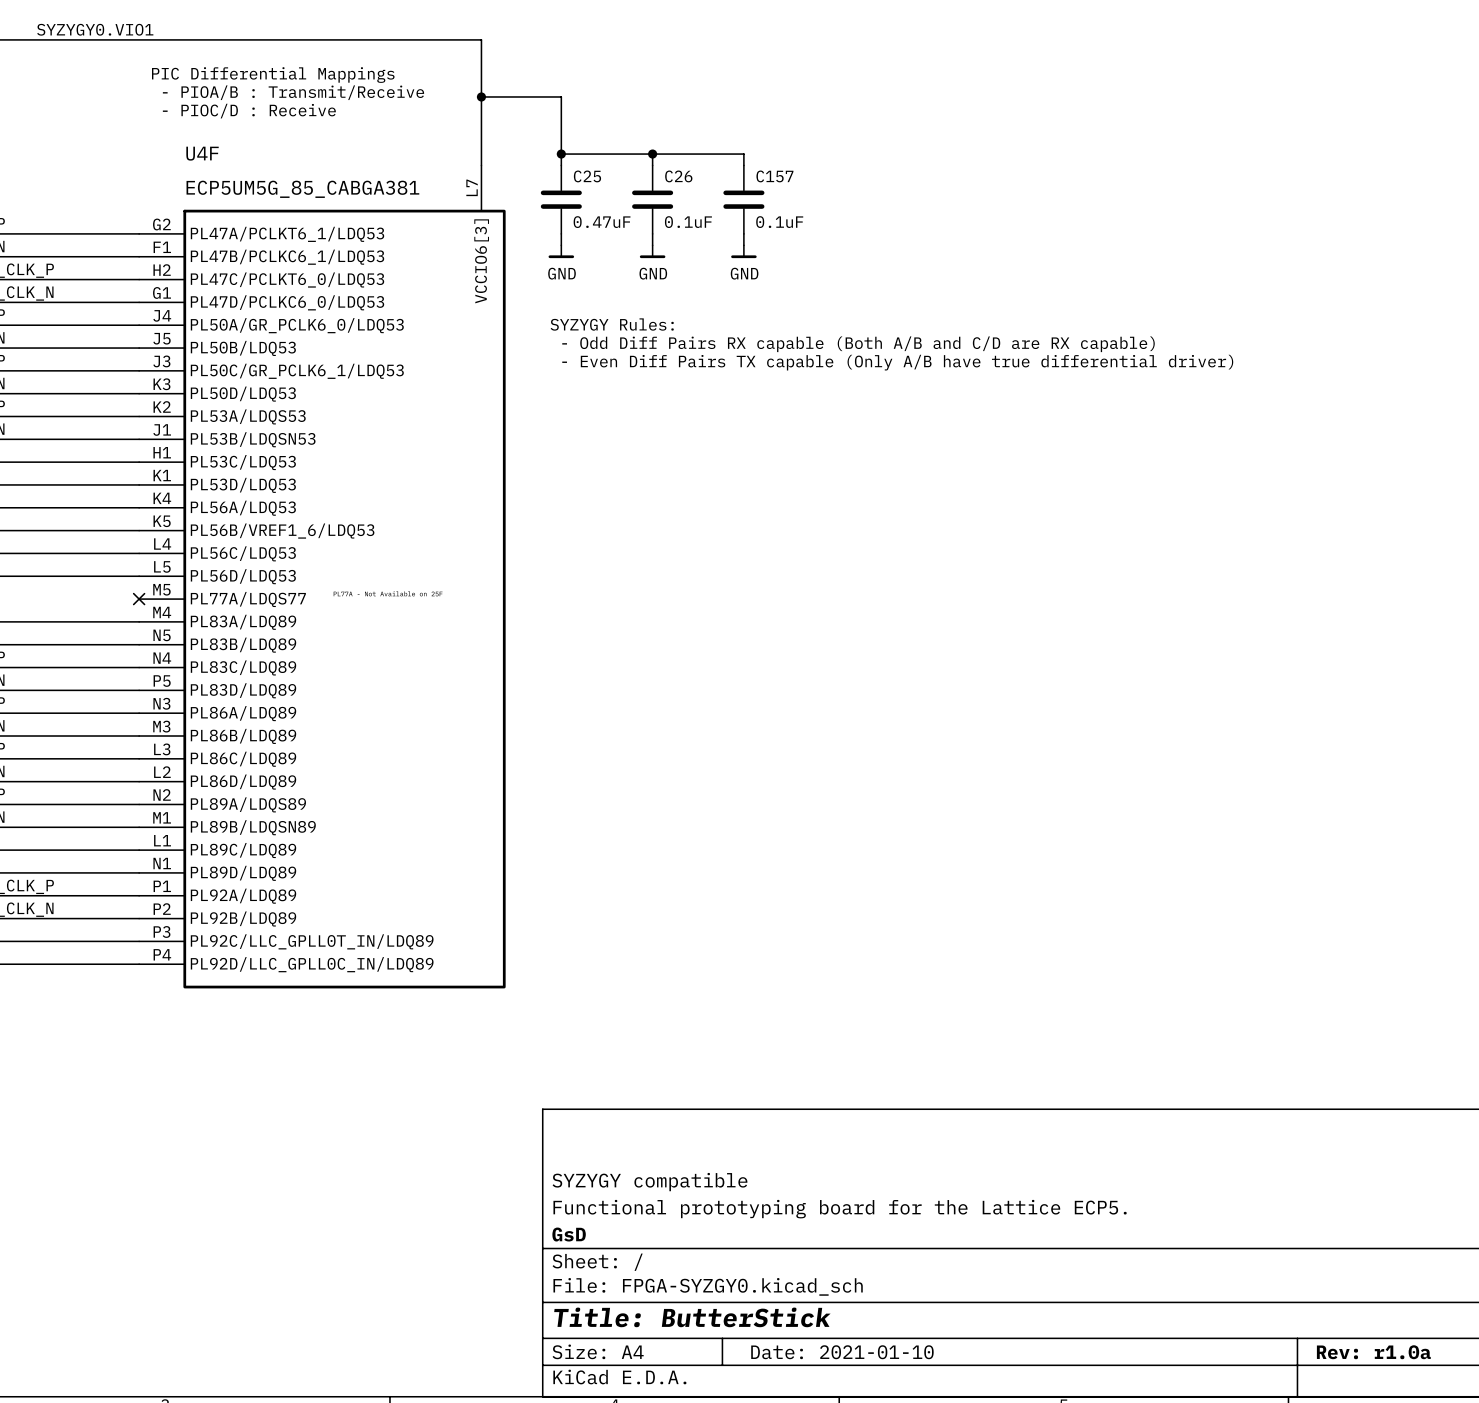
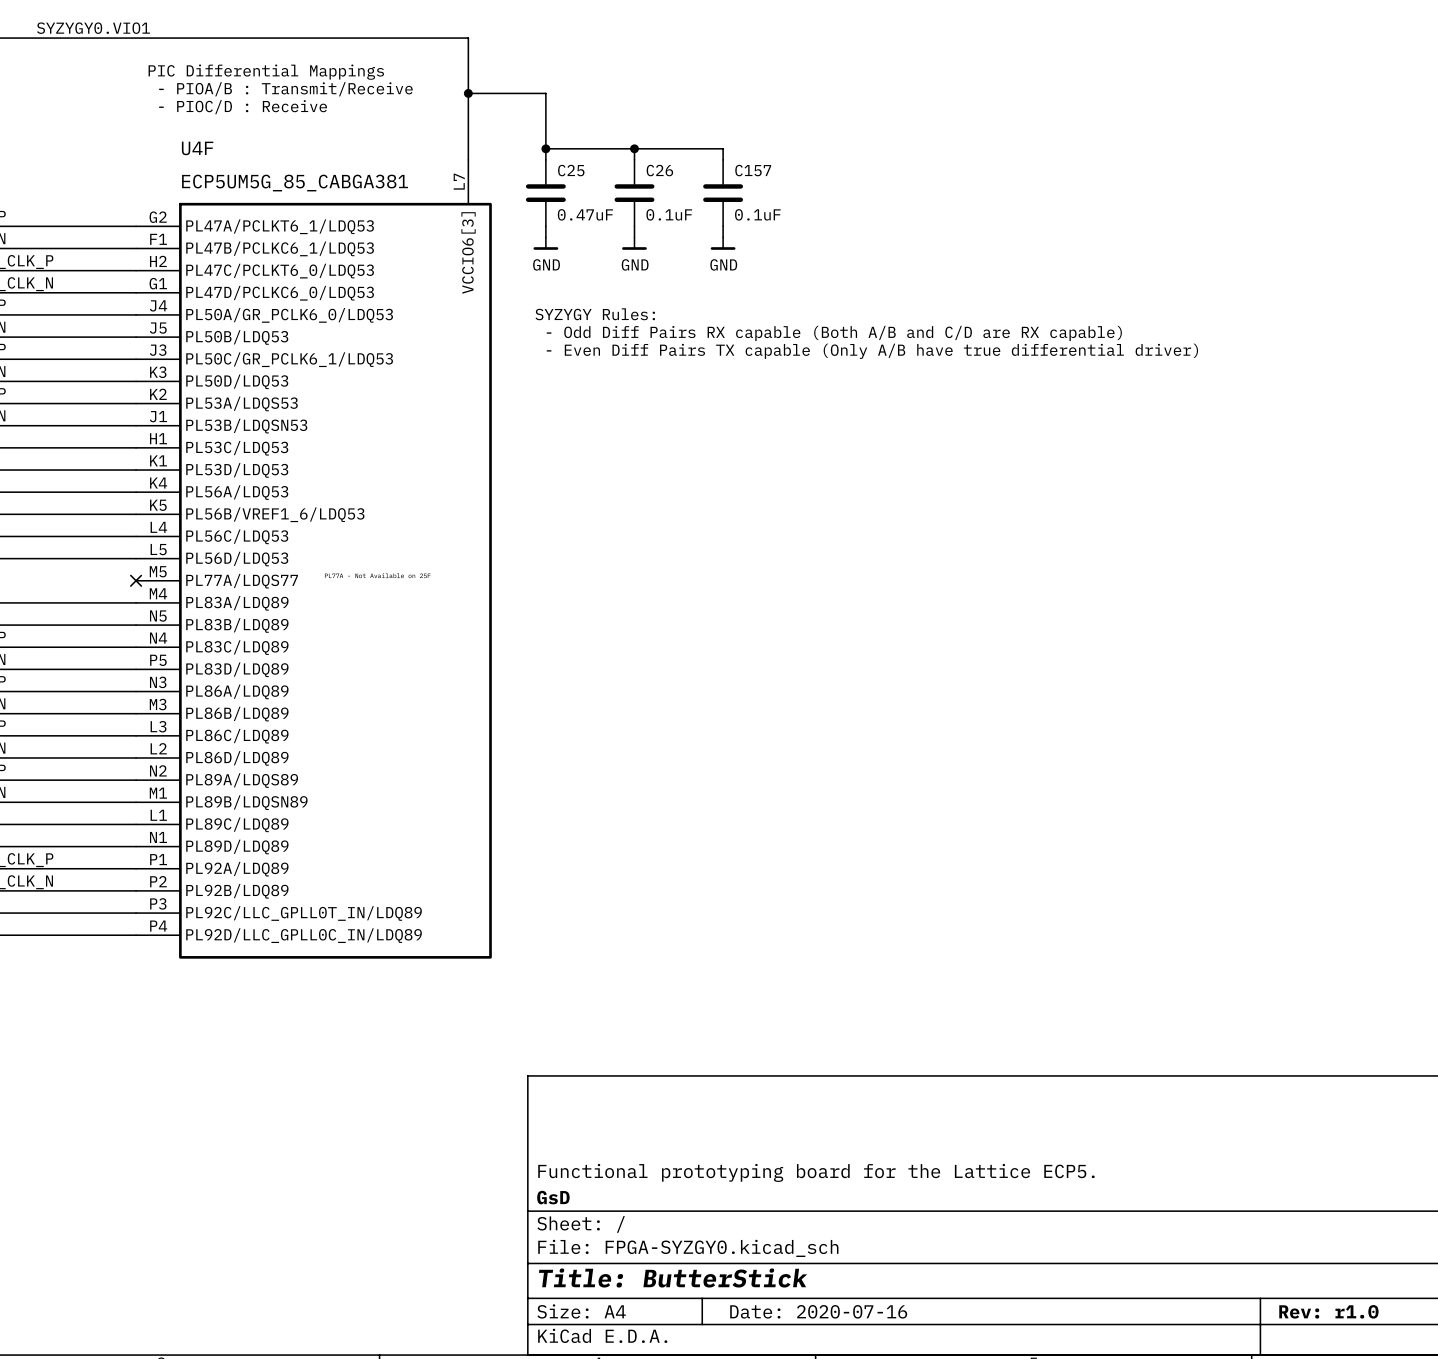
title block: SYZYGY compatible (649, 1182) -> none
title block: Date: 2021-01-10 (842, 1352) -> Date: 2020-07-16 (818, 1311)
title block: Rev: r1.0a (1373, 1352) -> Rev: r1.0 (1328, 1311)

